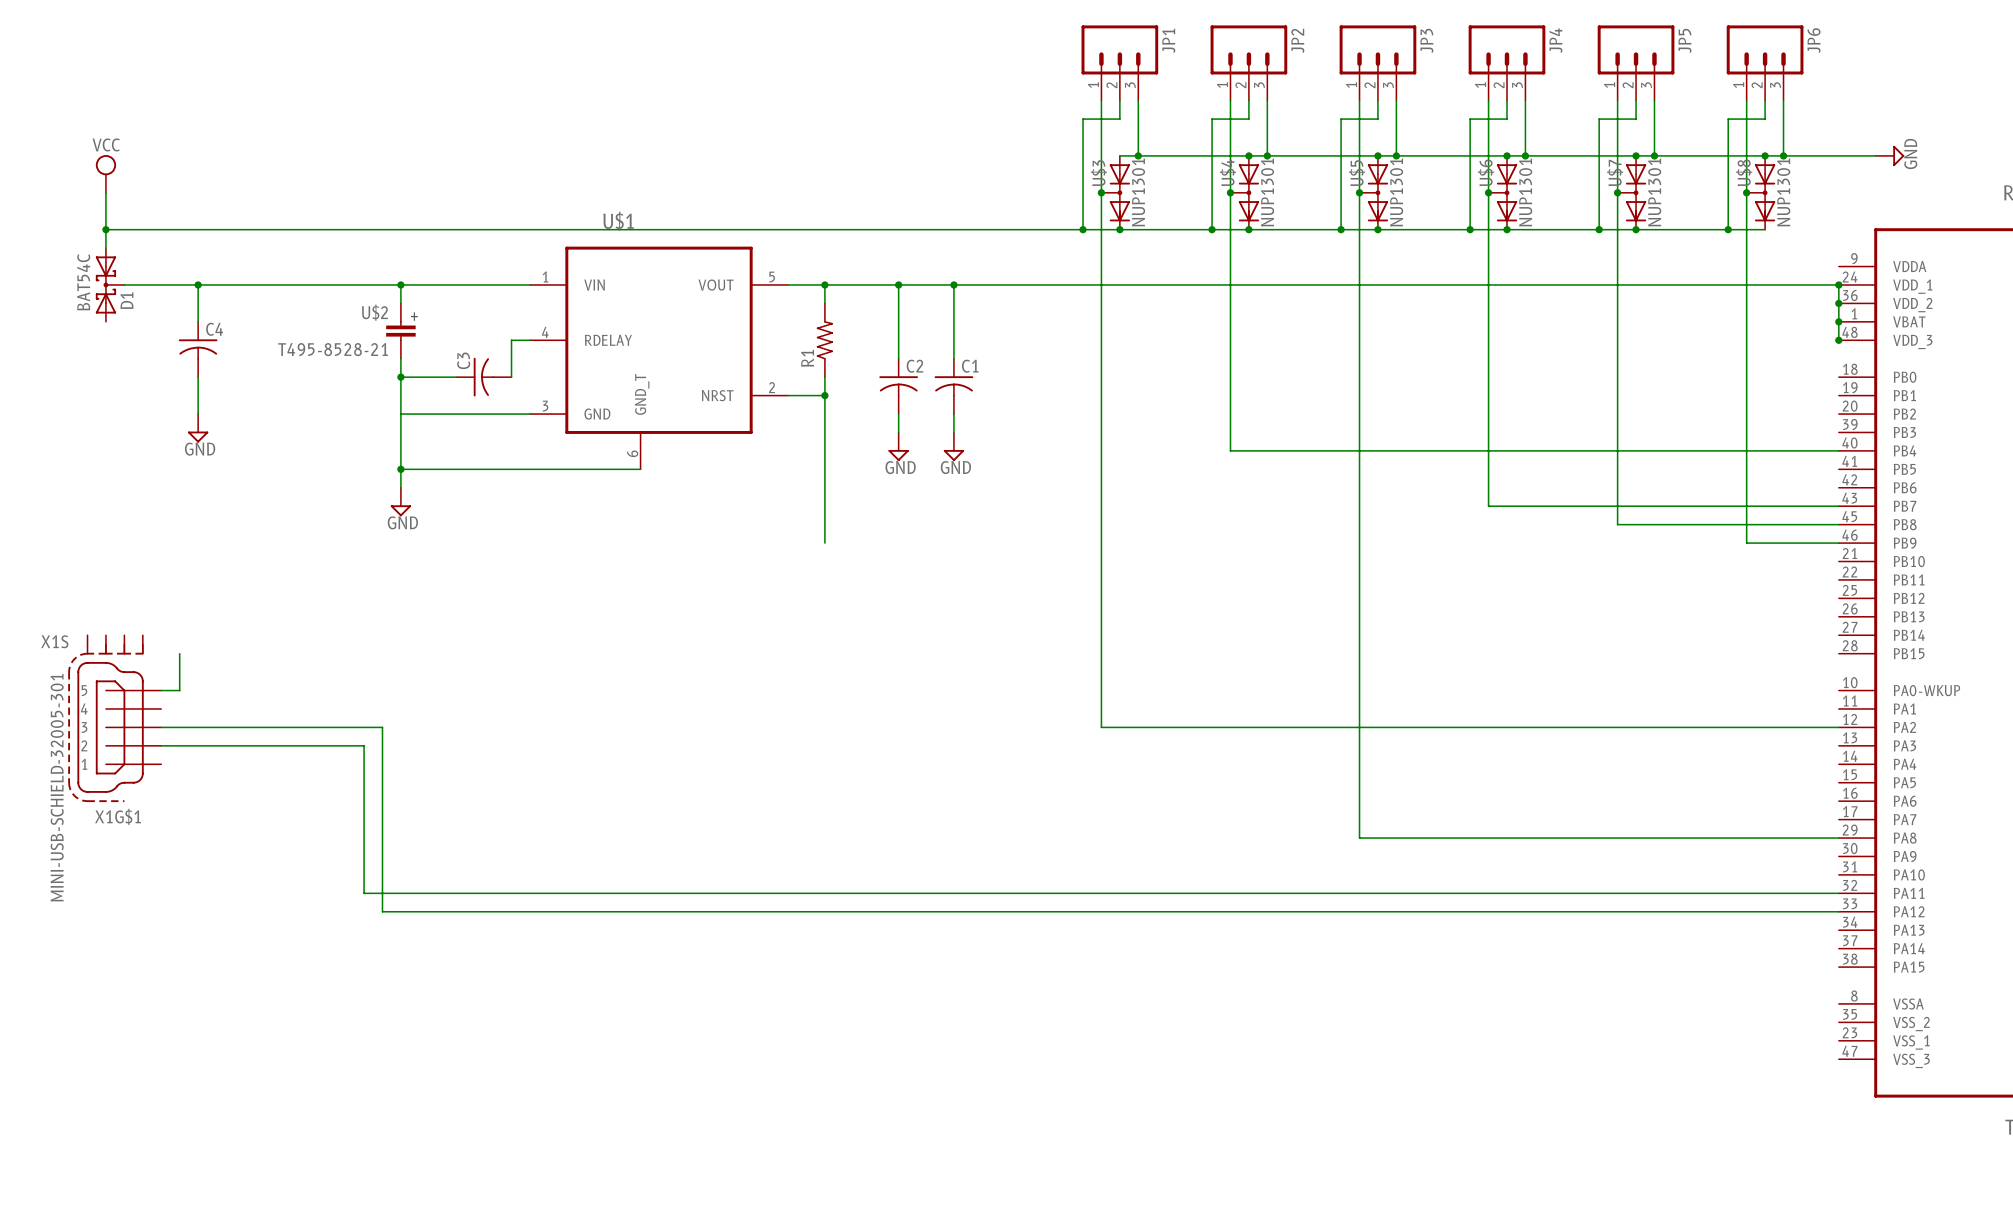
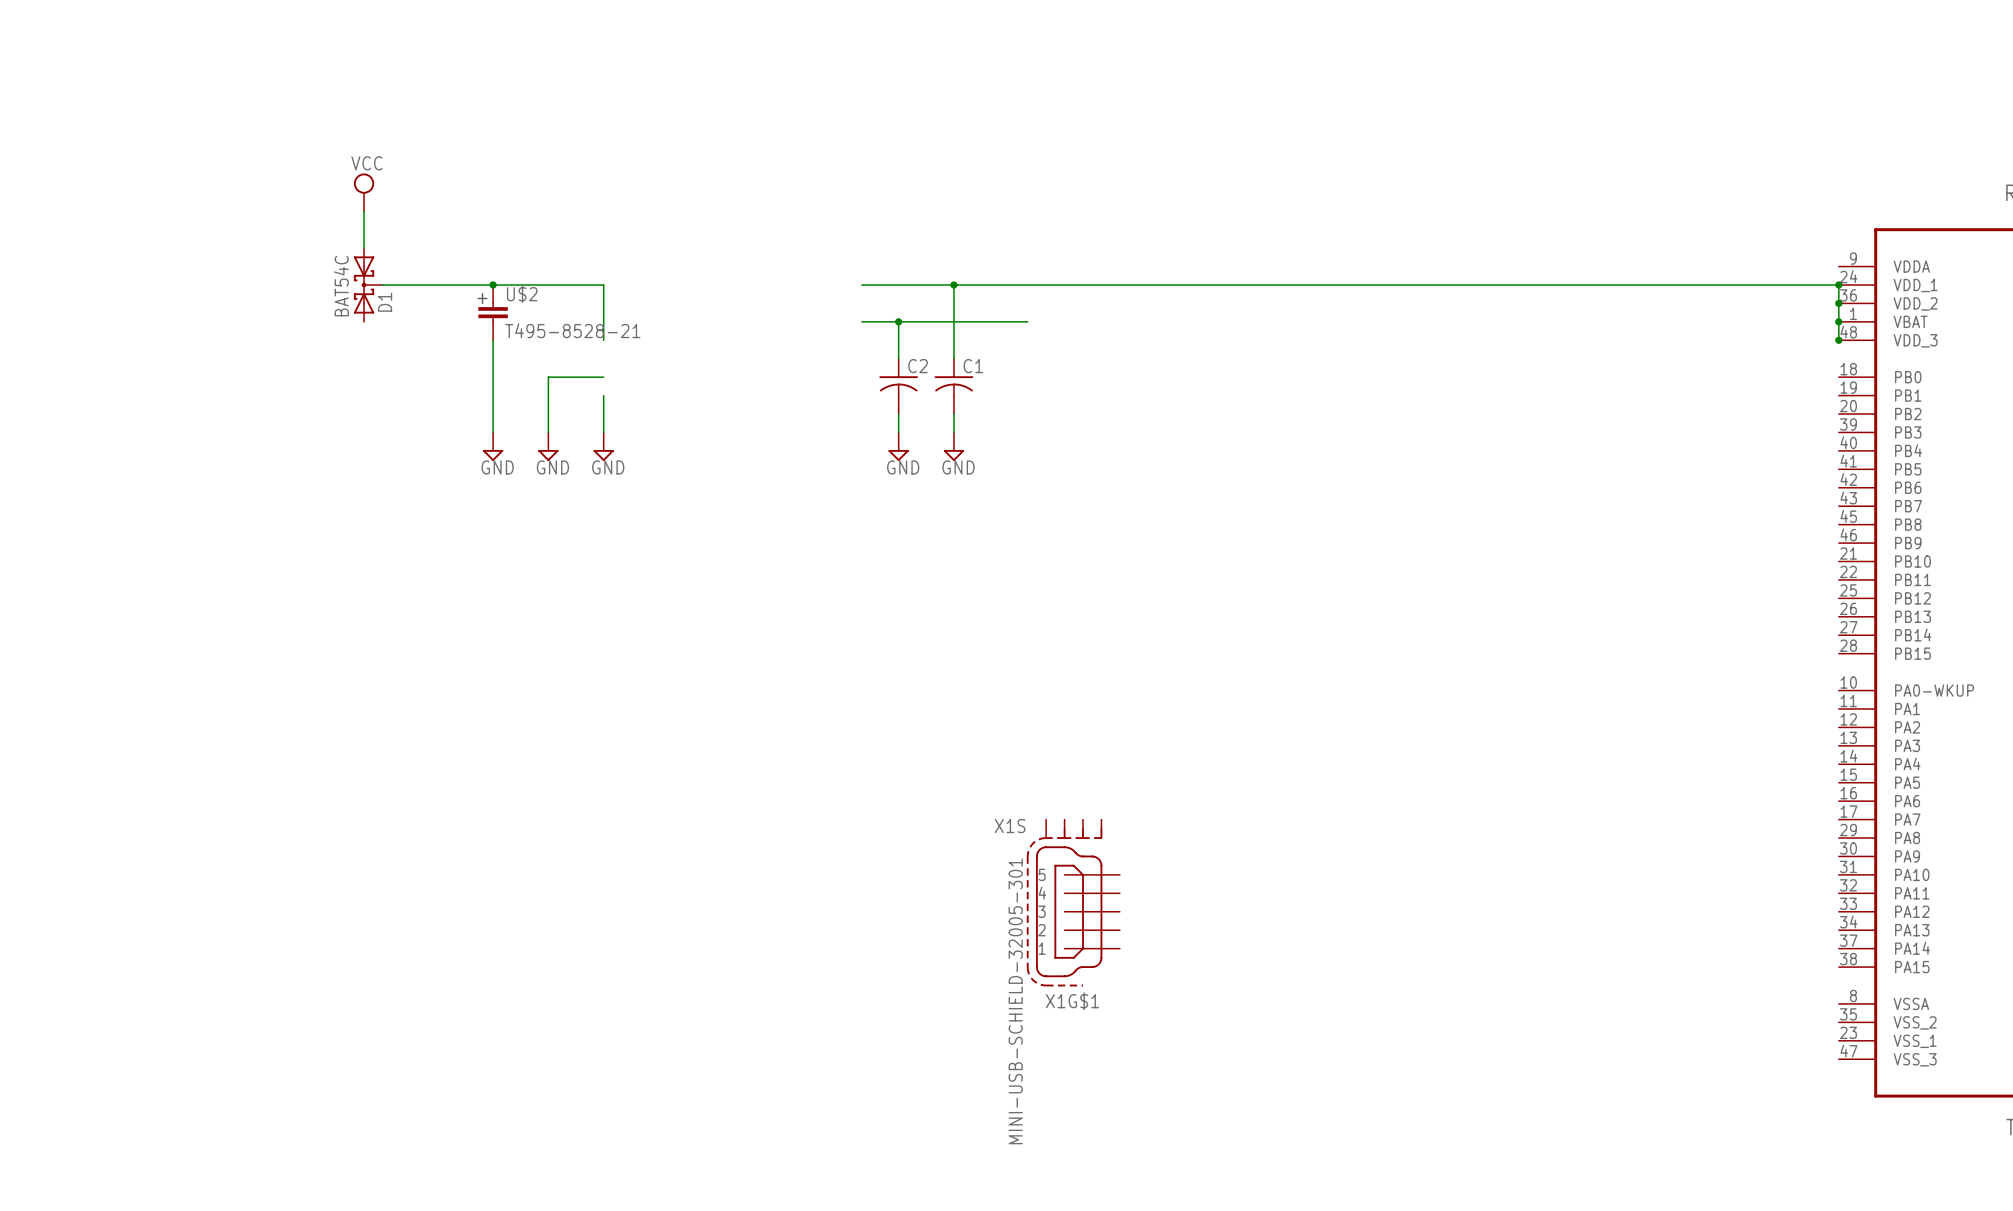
JP1: (1119, 63) -> none
JP2: (1248, 63) -> none
JP3: (1377, 63) -> none
JP4: (1507, 63) -> none
JP5: (1636, 63) -> none
JP6: (1765, 63) -> none
wire: (1101, 100) (1101, 727) (1838, 727) -> none
wire: (1119, 100) (1119, 119) (1083, 119) (1083, 229) -> none
wire: (1138, 100) (1138, 155) -> none
wire: (1230, 100) (1230, 450) (1838, 450) -> none
wire: (1248, 100) (1248, 119) (1212, 119) (1212, 229) -> none
wire: (1267, 100) (1267, 155) -> none
wire: (1359, 100) (1359, 838) (1838, 838) -> none
wire: (1377, 100) (1377, 119) (1341, 119) (1341, 229) -> none
wire: (1396, 100) (1396, 155) -> none
wire: (1488, 100) (1488, 506) (1838, 506) -> none
wire: (1507, 100) (1507, 119) (1470, 119) (1470, 229) -> none
wire: (1525, 100) (1525, 155) -> none
wire: (1617, 100) (1617, 524) (1838, 524) -> none
wire: (1636, 100) (1636, 119) (1599, 119) (1599, 229) -> none
wire: (1654, 100) (1654, 155) -> none
wire: (1746, 100) (1746, 543) (1838, 543) -> none
wire: (1765, 100) (1765, 119) (1728, 119) (1728, 229) -> none
wire: (1783, 100) (1783, 155) -> none
wire: (1119, 155) (1875, 155) -> none
junction: (1138, 155) -> none
junction: (1248, 155) -> none
junction: (1267, 155) -> none
junction: (1377, 155) -> none
junction: (1396, 155) -> none
junction: (1507, 155) -> none
junction: (1525, 155) -> none
junction: (1636, 155) -> none
junction: (1654, 155) -> none
junction: (1765, 155) -> none
junction: (1783, 155) -> none
power symbol: GND (1889, 155) -> none
power symbol: VCC (105, 173) -> none
wire: (105, 192) (105, 248) -> none
power symbol: none -> VCC (364, 192)
junction: (1101, 192) -> none
U$3: NUP1301 (1115, 192) -> none
junction: (1230, 192) -> none
U$4: NUP1301 (1244, 192) -> none
junction: (1359, 192) -> none
U$5: NUP1301 (1373, 192) -> none
junction: (1488, 192) -> none
U$6: NUP1301 (1502, 192) -> none
junction: (1617, 192) -> none
U$7: NUP1301 (1631, 192) -> none
junction: (1746, 192) -> none
U$8: NUP1301 (1760, 192) -> none
wire: none -> (364, 211) (364, 248)
wire: (105, 229) (1765, 229) -> none
junction: (105, 229) -> none
junction: (1083, 229) -> none
junction: (1119, 229) -> none
junction: (1212, 229) -> none
junction: (1248, 229) -> none
junction: (1341, 229) -> none
junction: (1377, 229) -> none
junction: (1470, 229) -> none
junction: (1507, 229) -> none
junction: (1599, 229) -> none
junction: (1636, 229) -> none
junction: (1728, 229) -> none
D1 position: (110, 284) -> (368, 284)
wire: (124, 284) (382, 284) -> none
wire: (198, 284) (198, 321) -> none
junction: (198, 284) -> none
wire: (400, 284) (400, 303) -> none
junction: (400, 284) -> none
junction: none -> (493, 284)
wire: none -> (529, 284) (603, 284) (603, 340)
wire: (788, 284) (861, 284) -> none
wire: (824, 284) (824, 303) -> none
junction: (824, 284) -> none
wire: (898, 284) (898, 321) -> none
junction position: (898, 284) -> (898, 321)
wire: none -> (861, 321) (1027, 321)
U$2 flip: as is (400, 331) -> left-right (493, 312)
U$2 position: (400, 331) -> (493, 312)
wire: none -> (493, 340) (493, 432)
wire: (529, 340) (511, 340) (511, 377) -> none
R1: (824, 340) -> none
C4: (198, 349) -> none
U$1: (659, 357) -> none
wire: (400, 358) (400, 487) -> none
wire: (198, 377) (198, 414) -> none
wire: (400, 377) (456, 377) -> none
junction: (400, 377) -> none
C3: (483, 377) -> none
wire: none -> (603, 377) (548, 377) (548, 432)
wire: (824, 377) (824, 543) -> none
wire: none -> (603, 395) (603, 432)
wire: (788, 395) (824, 395) -> none
junction: (824, 395) -> none
wire: (400, 414) (529, 414) -> none
power symbol: GND (198, 428) -> none
power symbol: none -> GND (493, 446)
power symbol: none -> GND (548, 446)
power symbol: none -> GND (603, 446)
wire: (400, 469) (640, 469) -> none
junction: (400, 469) -> none
power symbol: GND (400, 502) -> none
wire: (179, 653) (179, 690) (161, 690) -> none
X1S position: (105, 718) -> (1064, 903)
X1G$1 position: (119, 727) -> (1077, 911)
wire: (161, 727) (382, 727) (382, 911) (1838, 911) -> none
wire: (161, 745) (364, 745) (364, 893) (1838, 893) -> none

